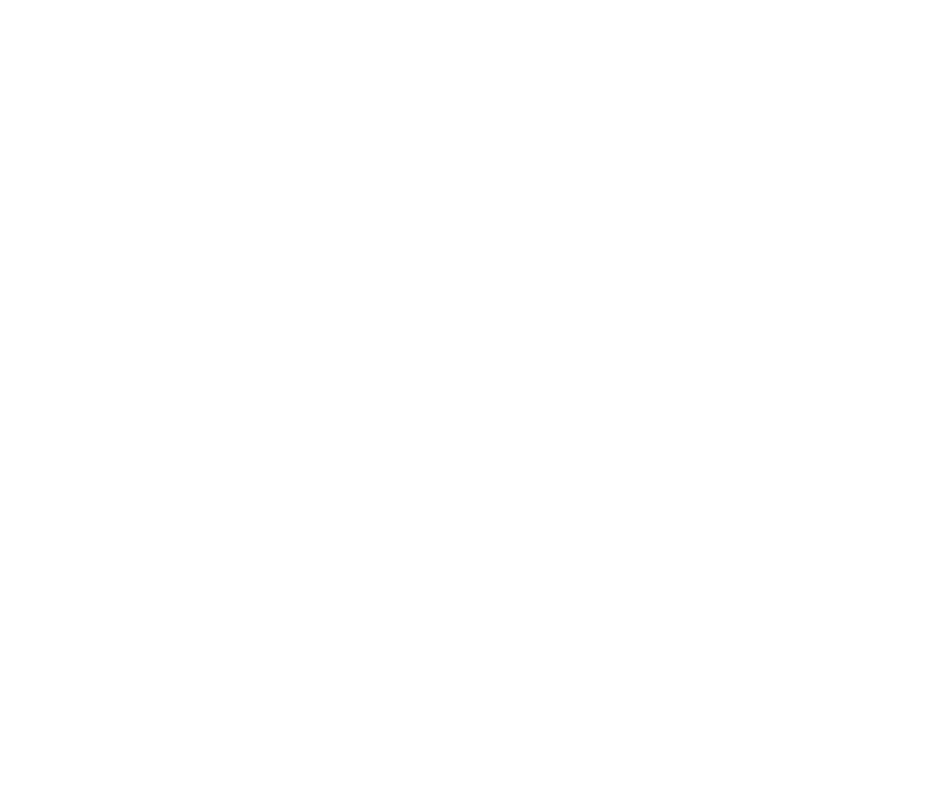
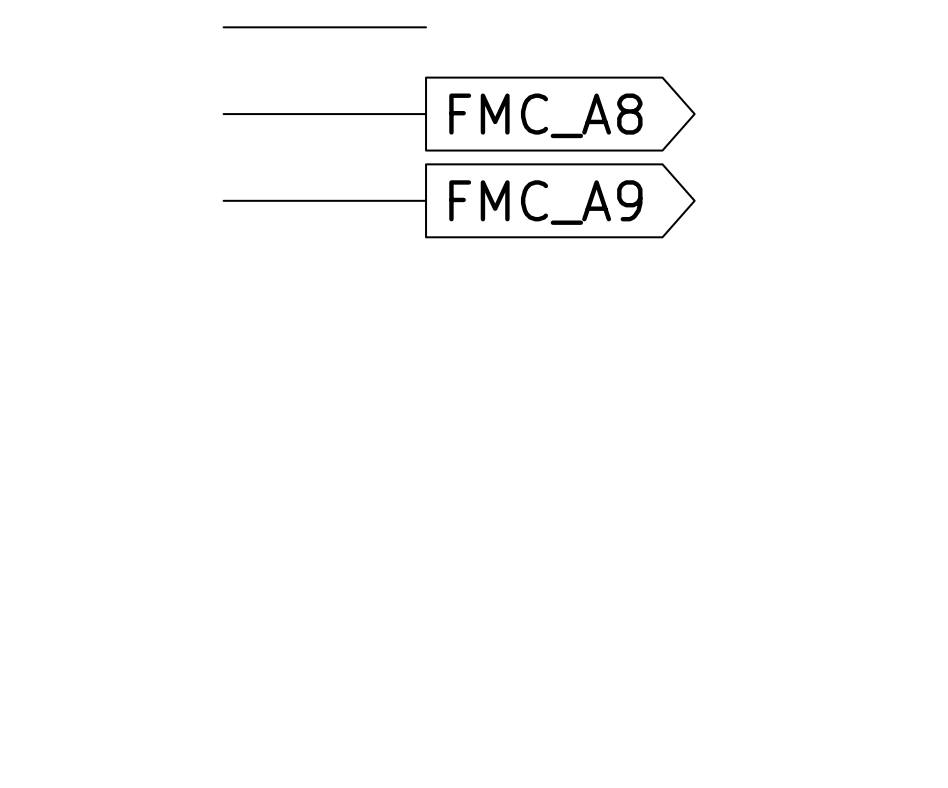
wire: none -> (223, 27) (426, 27)
wire: none -> (223, 114) (426, 114)
global label: none -> FMC_A8 (545, 115)
wire: none -> (223, 200) (426, 200)
global label: none -> FMC_A9 (545, 202)

